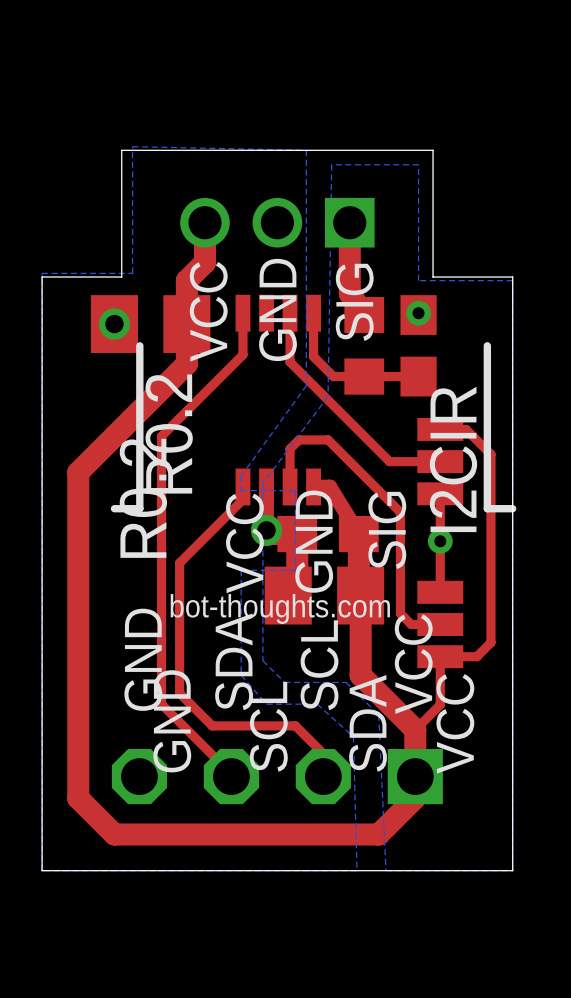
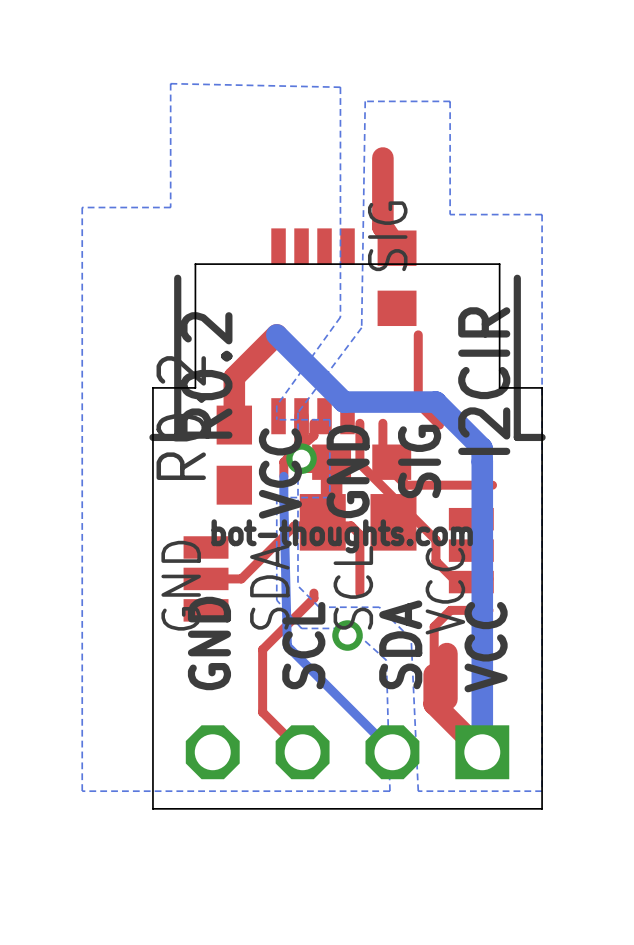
top track: (204, 222) (204, 262) (186, 280) (186, 363) (78, 472) (78, 798) (114, 834) (378, 834) (414, 798) (414, 776) -> none
part: (277, 222) -> none
text: GND (277, 309) -> none
text: VCC (208, 311) -> none
top track: (242, 313) (242, 354) (161, 436) (161, 704) (231, 774) (231, 776) -> none
top track: (290, 313) (290, 362) (389, 461) (440, 461) -> none
top track: (313, 313) (313, 356) (333, 376) (418, 376) -> none
via: (418, 313) -> none
via: (114, 324) -> none
part: (150, 324) -> none
part position: (418, 345) -> (234, 455)
top track: none -> (276, 334) (234, 377) (234, 425)
bottom track: none -> (276, 334) (343, 402) (435, 402) (481, 448) (482, 752)
top track: none -> (418, 334) (418, 403) (439, 425)
top track: (440, 429) (466, 429) (490, 454) (490, 642) (476, 656) (440, 656) (440, 704) (415, 729) (360, 675) (358, 534) (329, 486) (313, 486) -> none
board edge: (512, 458) (512, 277) (433, 277) (433, 150) (121, 150) (121, 277) (42, 277) (42, 870) (512, 870) -> (542, 387) (499, 387) (499, 264) (195, 264) (195, 387) (152, 387) (152, 808) (542, 808) (542, 791)
part position: (440, 461) -> (206, 578)
top track: (242, 486) (242, 499) (179, 562) (179, 693) (212, 725) (295, 725) (323, 753) (323, 776) -> none
top track: (291, 488) (290, 486) (290, 448) (299, 439) (328, 439) (400, 512) (400, 613) (411, 624) (440, 624) -> none
top track: (440, 493) (440, 592) -> none
top track: none -> (313, 423) (313, 435) (283, 462) (283, 476)
top track: none -> (359, 423) (359, 463) (435, 540) (435, 561) (453, 578) (489, 578)
top track: none -> (382, 423) (382, 462) (405, 485) (492, 485)
via: (440, 541) -> none
bottom track: none -> (283, 476) (287, 646) (392, 752)
top track: none -> (206, 578) (241, 578) (294, 525) (351, 525) (359, 534) (359, 593)
top track: none -> (313, 593) (313, 598) (262, 649) (262, 712) (302, 752)
top track: none -> (489, 610) (450, 610) (434, 626) (434, 704) (482, 752)
via: none -> (347, 635)
part position: (277, 776) -> (347, 752)

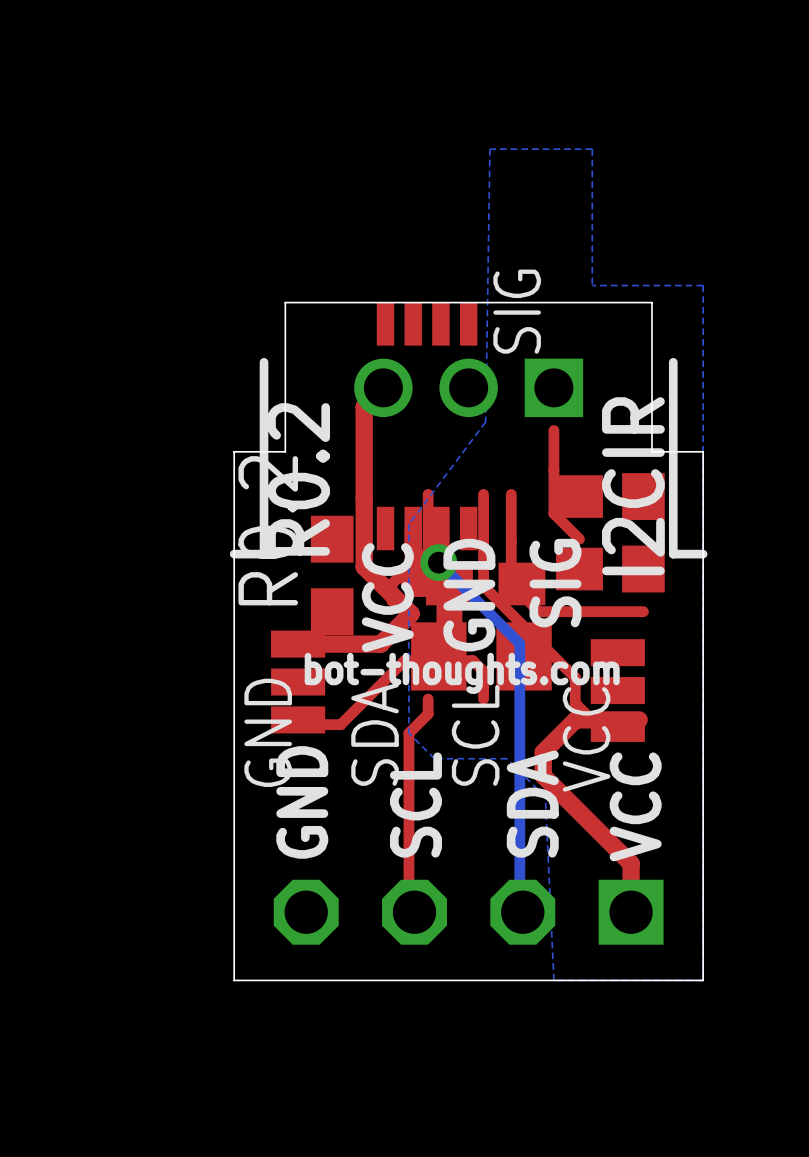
bottom zone outline: (170, 83) (170, 207) (82, 207) (82, 791) (389, 791) (386, 660) (351, 628) (301, 628) (276, 600) (276, 497) (329, 497) (329, 419) (276, 419) (276, 405) (340, 317) (340, 87) (170, 83) -> none
top track: (382, 157) (382, 226) (397, 248) -> none
board edge: (499, 264) (195, 264) -> (651, 345) (651, 302) (285, 302) (285, 345)
part position: (397, 278) -> (579, 532)
top track: none -> (383, 387) (364, 407) (364, 566) (411, 613) (380, 644) (298, 644)
part: none -> (468, 387)
bottom track: (276, 334) (343, 402) (435, 402) (481, 448) (482, 752) -> none
top track: (276, 334) (234, 377) (234, 425) -> none
board edge: (195, 352) (195, 387) (152, 387) -> (285, 451) (234, 451) (234, 494)
board edge: (499, 352) (499, 387) (542, 387) -> (651, 451) (703, 451) (703, 494)
top track: none -> (428, 494) (428, 537)
top track: none -> (511, 494) (511, 537)
part: none -> (643, 532)
bottom track: none -> (438, 562) (519, 643) (519, 900) (522, 912)
via position: (301, 458) -> (438, 562)
bottom track: (283, 476) (287, 646) (392, 752) -> none
top track: none -> (428, 699) (428, 713) (408, 733) (408, 906) (414, 912)
top track: (359, 557) (359, 593) -> (483, 494) (483, 537)
top track: none -> (639, 719) (575, 719) (543, 752) (543, 775) (631, 863) (631, 912)
part position: (206, 578) -> (298, 682)
top track: (313, 593) (313, 598) (262, 649) (262, 712) (302, 752) -> none
top track: (489, 610) (450, 610) (434, 626) (434, 704) (482, 752) -> none
via: (347, 635) -> none
top track: (446, 653) (446, 699) -> none
part position: (347, 752) -> (468, 912)
board edge: (542, 791) (542, 808) (152, 808) (152, 791) -> (703, 980) (234, 980)

